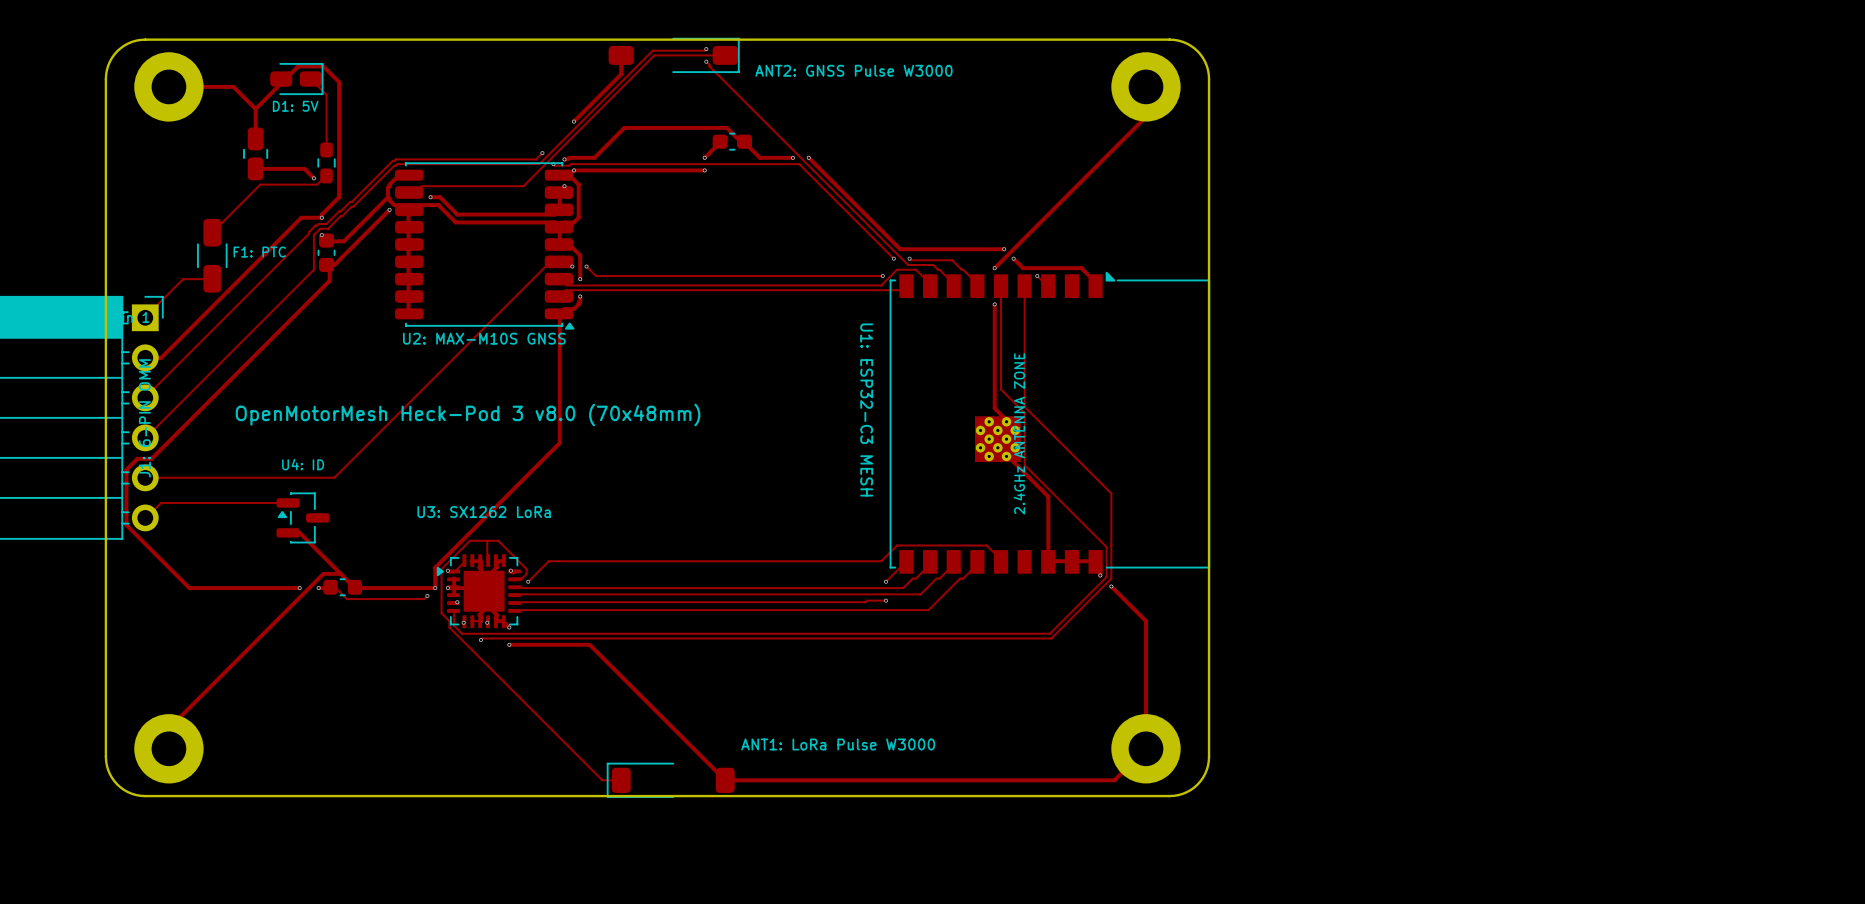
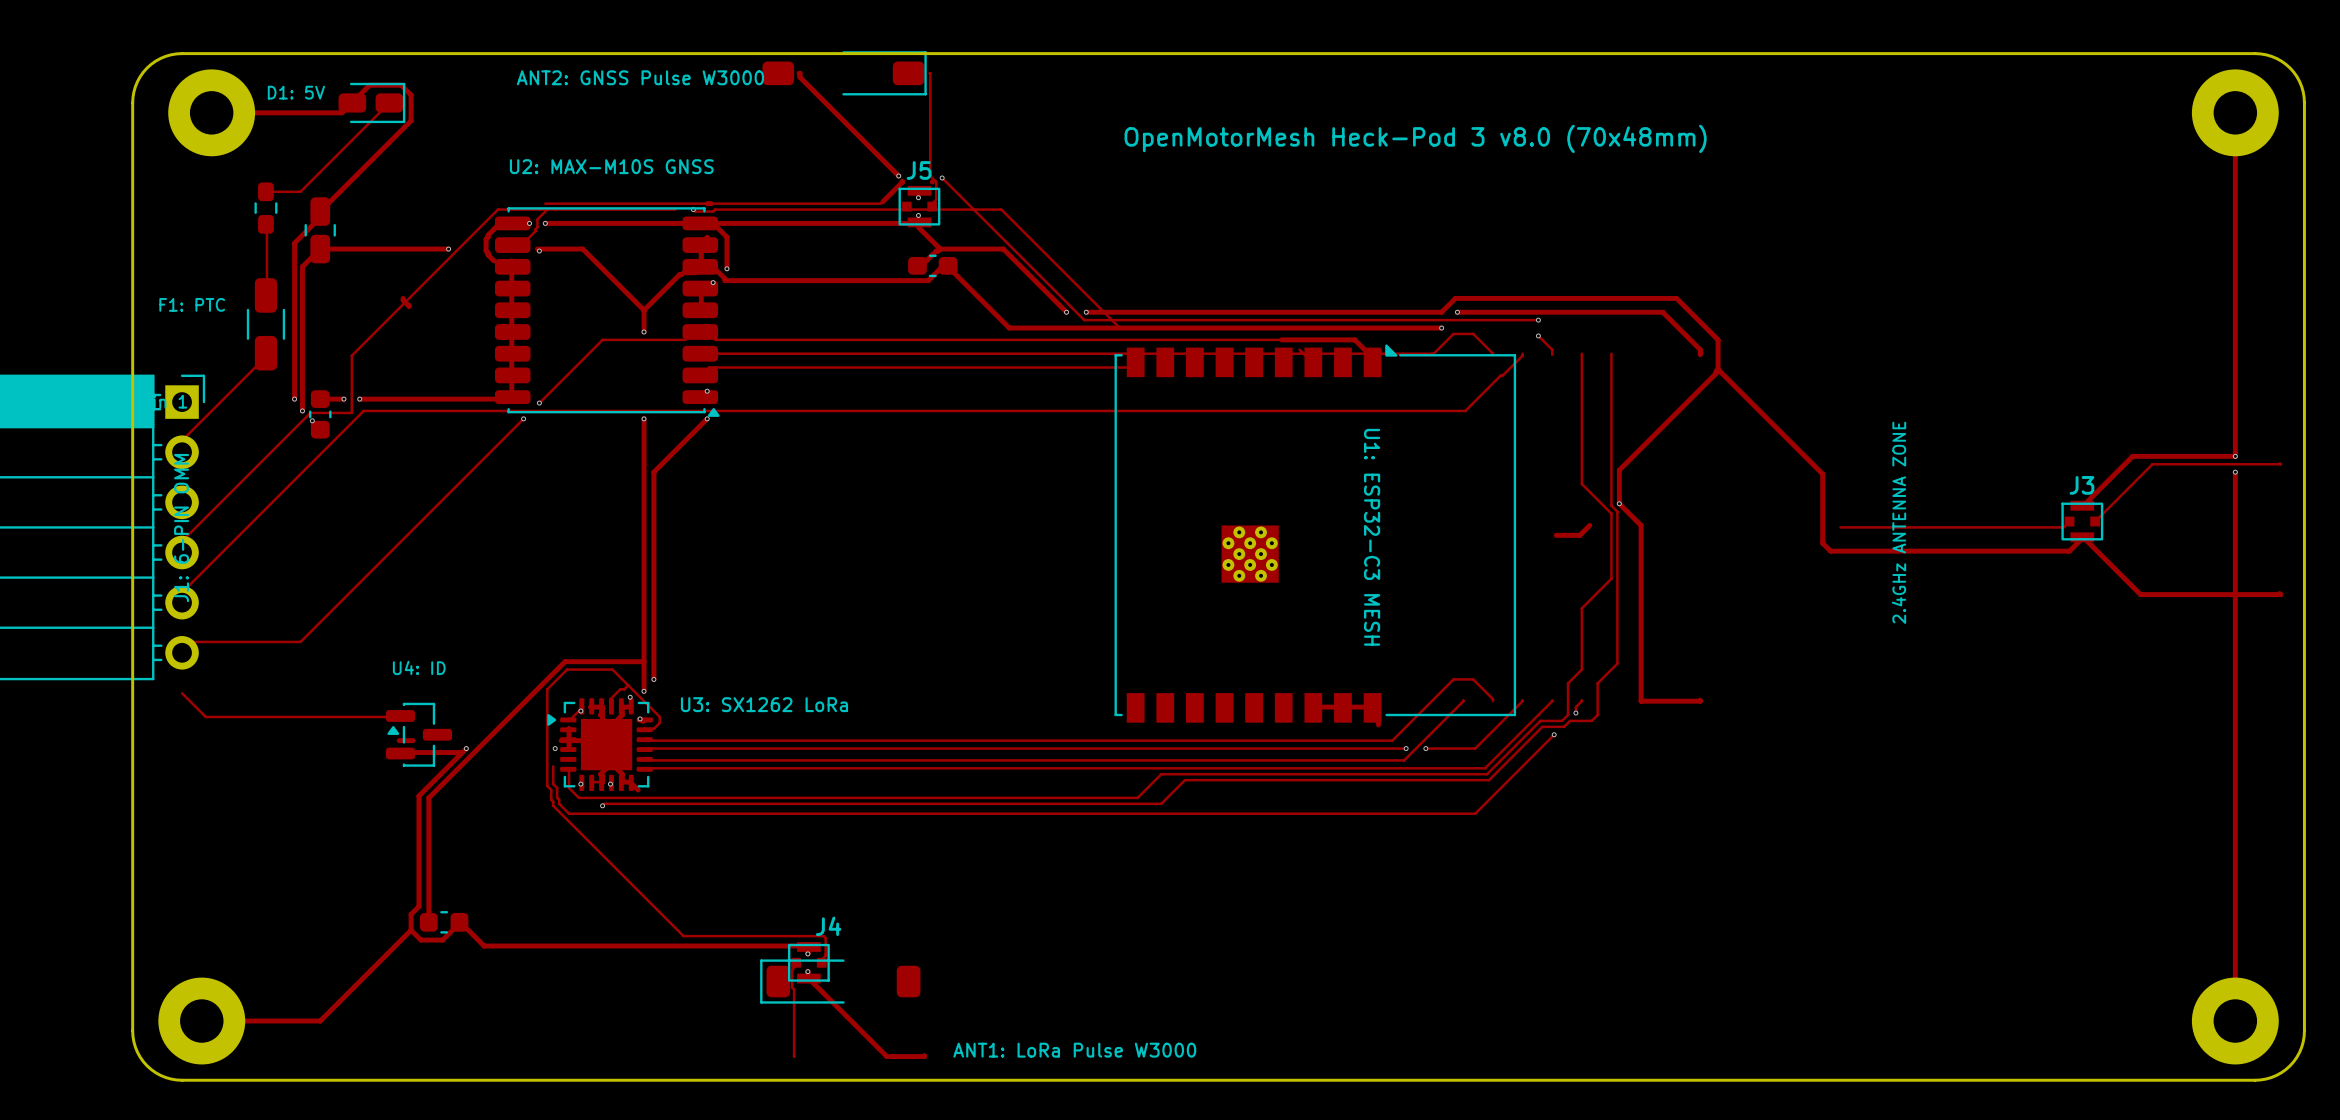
board edge: (1169, 39) (1186, 43) (1197, 51) (1206, 66) (1209, 79) (1209, 756) (1205, 773) (1190, 790) (1169, 796) (145, 796) (132, 793) (117, 784) (109, 773) (105, 756) -> (1465, 53) (2255, 53) (2276, 58) (2293, 72) (2301, 86) (2304, 102) (2304, 1030) (2299, 1052) (2285, 1069) (2271, 1077) (2255, 1080) (176, 1079) (165, 1077) (151, 1069) (143, 1061) (135, 1047) (132, 1030) (132, 951)
track: (706, 49) (704, 50) (652, 50) (539, 164) -> none
via: (706, 49) -> none
track: (621, 55) (621, 74) (573, 121) -> none
track: none -> (799, 73) (800, 77) (898, 176)
track: (725, 55) (654, 55) (523, 186) (421, 186) -> none
track: none -> (929, 73) (930, 176) (936, 181) (936, 199) (932, 203) (932, 207)
track: (706, 61) (908, 264) (933, 264) (953, 283) (953, 286) -> none
via: (706, 61) -> none
text position: ANT2: GNSS Pulse W3000 (853, 70) -> ANT2: GNSS Pulse W3000 (640, 77)
track: (310, 79) (326, 94) (326, 149) -> (389, 102) (300, 191) (265, 191)
track: (233, 86) (255, 108) -> (292, 112) (341, 112) (369, 85) (401, 85) (411, 95) (411, 120) (320, 211) (320, 217) (294, 243) (294, 399)
track: (1146, 86) (1146, 116) (994, 268) -> none
part: (1146, 86) -> none
track: none -> (2235, 112) (2235, 456) (2132, 456) (2082, 505)
part: none -> (2235, 112)
text position: D1: 5V (295, 106) -> D1: 5V (296, 92)
text: none -> OpenMotorMesh Heck-Pod 3 v8.0 (70x48mm) (1415, 138)
track: (255, 108) (298, 66) (323, 66) (339, 82) (339, 197) (321, 214) (321, 217) (301, 217) (161, 357) (145, 357) -> none
track: (255, 108) (255, 138) -> none
via: (573, 121) -> none
via: none -> (898, 176)
track: none -> (942, 177) (1084, 320) (1538, 320)
via: none -> (942, 177)
part position: (732, 141) -> (932, 265)
part position: (255, 153) -> (320, 230)
track: (542, 153) (536, 159) -> (707, 203) (671, 203)
via: (542, 153) -> none
via: none -> (918, 197)
via: (704, 157) -> none
track: (792, 157) (759, 157) (726, 127) (624, 127) (594, 157) (567, 159) -> (882, 201) (880, 203) (711, 203)
via: (792, 157) -> none
track: (808, 157) (900, 249) (1004, 249) -> none
via: (808, 157) -> none
track: (435, 159) (392, 160) (326, 224) (315, 225) (145, 397) -> none
via: (564, 159) -> none
J5: none -> (919, 206)
part position: (326, 162) -> (265, 208)
track: none -> (547, 209) (537, 219) (535, 231) (521, 245) (512, 245)
track: (395, 165) (328, 228) (320, 228) (313, 235) (313, 269) (145, 438) -> (495, 211) (351, 355) (351, 412) (310, 412) (182, 541)
track: (255, 168) (304, 168) (313, 178) -> none
via: none -> (918, 215)
via: (573, 170) -> none
track: (704, 170) (573, 170) (569, 175) -> (919, 222) (713, 223)
via: (704, 170) -> none
track: (326, 175) (317, 184) (260, 184) (213, 231) -> (265, 224) (266, 294)
via: none -> (529, 223)
track: none -> (545, 223) (700, 223)
via: none -> (545, 223)
via: (313, 178) -> none
track: none -> (918, 227) (940, 249)
track: (578, 184) (578, 217) (573, 222) (564, 222) (559, 227) (555, 222) (455, 222) (438, 205) (394, 205) -> (724, 235) (726, 237) (726, 268)
via: (564, 186) -> none
track: none -> (448, 249) (320, 249) (302, 266) (302, 410)
via: none -> (448, 249)
track: none -> (537, 249) (582, 249) (644, 310)
track: none -> (940, 249) (1003, 249) (1066, 312)
track: none -> (940, 249) (920, 266) (917, 265)
track: (387, 197) (343, 241) (326, 241) -> none
track: (430, 197) (439, 197) (457, 214) (545, 214) -> (644, 310) (683, 272)
track: (389, 209) (334, 264) (326, 264) -> none
via: (389, 209) -> none
track: none -> (701, 266) (713, 266) (724, 280) (928, 280) (942, 266) (948, 266)
track: none -> (948, 266) (1009, 328) (1441, 328)
via: none -> (726, 268)
via: (321, 217) -> none
via: none -> (713, 282)
via: (321, 235) -> none
track: none -> (644, 310) (644, 331)
track: (559, 244) (569, 244) (580, 255) (580, 279) -> none
via: none -> (1066, 312)
track: none -> (1086, 312) (1441, 312) (1455, 298) (1676, 298) (1718, 339) (1718, 369)
via: none -> (1086, 312)
track: none -> (1457, 312) (1662, 312) (1700, 349) (1700, 354)
via: none -> (1457, 312)
via: (1004, 249) -> none
text position: F1: PTC (259, 252) -> F1: PTC (192, 304)
part position: (326, 252) -> (320, 414)
via: none -> (1538, 320)
via: (893, 258) -> none
track: (909, 258) (911, 260) (952, 260) (977, 283) (977, 286) -> none
via: (909, 258) -> none
track: (1013, 258) (1023, 268) -> (715, 339) (1281, 339)
via: (1013, 258) -> none
via: none -> (1441, 328)
via: none -> (644, 331)
track: (558, 261) (550, 261) (334, 477) (145, 477) -> none
track: (329, 264) (329, 280) (151, 458) (137, 458) (126, 469) (126, 525) (189, 588) (299, 588) -> none
track: none -> (1538, 335) (1552, 349) (1552, 354)
via: none -> (1538, 335)
via: (572, 266) -> none
track: (586, 266) (596, 276) (882, 276) -> none
via: (586, 266) -> none
track: none -> (685, 339) (602, 339) (539, 403)
via: (994, 268) -> none
via: (882, 276) -> none
via: (1037, 276) -> none
track: (213, 279) (183, 279) (145, 317) -> (266, 353) (182, 440)
track: none -> (701, 353) (1433, 353) (1453, 333) (1473, 333) (1492, 354)
via: (580, 279) -> none
track: none -> (1522, 353) (1465, 410) (363, 410) (182, 592)
track: (566, 285) (881, 285) (897, 269) (915, 269) (930, 286) -> none
track: (1001, 285) (1001, 389) (1024, 413) (1024, 465) (1106, 547) (1106, 577) (1049, 633) (908, 633) -> (1581, 353) (1581, 484) (1611, 513) (1611, 578) (1581, 608) (1581, 669) (1568, 683) (1568, 715) (1562, 720) (1540, 720) (1487, 774) (1161, 774) (1137, 797)
track: (1024, 285) (1024, 406) (1111, 493) (1111, 578) (1051, 638) (926, 638) -> (1611, 353) (1611, 505) (1617, 511) (1617, 663) (1597, 683) (1597, 715) (1591, 720) (1569, 720) (1564, 726) (1542, 726) (1489, 780) (1185, 780) (1161, 803)
track: none -> (1718, 369) (1822, 474) (1822, 543) (1830, 551) (2069, 551) (2083, 537)
track: none -> (1718, 369) (1619, 470) (1619, 503) (1641, 525) (1641, 701) (1700, 700)
track: (580, 296) (578, 304) (573, 309) (564, 309) -> none
via: (580, 296) -> none
track: (994, 304) (994, 408) (1007, 421) -> none
via: (994, 304) -> none
via: none -> (707, 391)
track: none -> (511, 397) (509, 399) (359, 399)
track: (559, 313) (559, 443) (435, 567) (435, 588) (354, 588) -> none
via: none -> (294, 399)
track: none -> (320, 399) (343, 399)
via: none -> (343, 399)
via: none -> (359, 399)
via: none -> (539, 403)
via: none -> (302, 410)
track: none -> (523, 418) (300, 641) (182, 641)
via: none -> (523, 418)
track: none -> (644, 418) (644, 691)
via: none -> (644, 418)
track: none -> (707, 418) (653, 472) (653, 679)
via: none -> (707, 418)
via: none -> (312, 420)
text position: U2: MAX-M10S GNSS (484, 338) -> U2: MAX-M10S GNSS (611, 166)
via: none -> (2235, 456)
track: none -> (2279, 463) (2152, 464) (2095, 521)
track: none -> (2235, 472) (2235, 1021)
via: none -> (2235, 472)
via: none -> (1619, 503)
text position: U1: ESP32-C3 MESH (866, 409) -> U1: ESP32-C3 MESH (1372, 537)
track: none -> (2069, 521) (2063, 527) (1840, 527)
J3: none -> (2082, 521)
text: none -> 2.4GHz ANTENNA ZONE (1898, 522)
text: OpenMotorMesh Heck-Pod 3 v8.0 (70x48mm) (468, 415) -> none
track: none -> (1589, 525) (1579, 535) (1556, 535)
track: none -> (2083, 537) (2140, 594) (2279, 593)
text: 2.4GHz ANTENNA ZONE (1019, 433) -> none
track: (1007, 455) (1048, 496) (1048, 561) -> none
text position: U4: ID (303, 464) -> U4: ID (419, 667)
track: (288, 502) (161, 502) (145, 518) -> none
text position: U3: SX1262 LoRa (484, 512) -> U3: SX1262 LoRa (764, 704)
part: (302, 517) -> none
track: none -> (644, 661) (565, 661) (428, 797) (428, 922)
track: (299, 532) (354, 588) -> none
via: none -> (653, 679)
track: (487, 540) (487, 554) -> (628, 685) (624, 689) (620, 689) (610, 699)
track: (498, 540) (469, 540) (441, 569) (441, 608) -> (624, 681) (612, 669) (567, 669) (547, 689) (547, 786) (551, 790) (553, 805) (683, 936) (823, 936) (825, 938) (825, 955) (821, 962)
via: none -> (644, 691)
track: none -> (182, 693) (205, 716) (400, 715)
via: none -> (630, 697)
track: none -> (1522, 700) (1475, 748) (1425, 748)
track: none -> (1581, 700) (1575, 707) (1575, 713)
track: (906, 561) (885, 581) -> none
track: (930, 561) (930, 564) (915, 578) (912, 578) (903, 588) -> (1492, 701) (1473, 679) (1453, 679) (1392, 740) (1131, 740)
track: (953, 561) (953, 564) (939, 578) (936, 578) (920, 594) -> (1406, 748) (1153, 748)
track: (977, 561) (977, 564) (963, 578) (960, 578) (928, 610) -> (1552, 700) (1485, 768) (1163, 768)
track: (1001, 561) (986, 545) (897, 545) (881, 561) (548, 561) (528, 581) -> none
via: none -> (580, 711)
via: none -> (1575, 713)
via: (447, 570) -> none
track: (340, 573) (323, 573) (168, 728) (168, 748) -> none
via: (1100, 575) -> none
part footprint: [323, 578, 362, 597] -> [385, 702, 453, 767]
via: (528, 581) -> none
via: (885, 581) -> none
via: none -> (1554, 734)
track: (1111, 586) (1146, 621) (1146, 748) (1114, 780) (725, 780) (589, 644) (509, 644) -> none
via position: (1111, 586) -> (1406, 748)
track: (330, 587) (334, 586) (347, 599) (424, 599) (427, 595) -> none
via: (299, 588) -> none
via: (318, 588) -> none
via: (435, 588) -> none
via: (447, 588) -> none
track: none -> (466, 748) (462, 752) (400, 753)
via: none -> (466, 748)
via: none -> (555, 748)
via: none -> (1425, 748)
via: (427, 595) -> none
track: none -> (460, 752) (418, 795) (418, 906) (411, 914) (411, 930)
track: (885, 600) (515, 602) (514, 603) -> (1463, 700) (1404, 760) (644, 760)
via: (885, 600) -> none
via: (457, 602) -> none
track: (441, 613) (449, 621) (449, 627) (602, 780) (621, 780) -> (553, 772) (553, 784) (557, 788) (559, 803) (569, 813) (1475, 813) (1554, 734)
via: (509, 627) -> none
via: (509, 644) -> none
part: none -> (444, 922)
track: none -> (460, 922) (484, 946) (807, 946)
track: none -> (460, 922) (442, 940) (420, 940) (411, 930)
track: none -> (411, 930) (320, 1021) (201, 1021)
text position: ANT1: LoRa Pulse W3000 (838, 744) -> ANT1: LoRa Pulse W3000 (1074, 1050)
part position: (168, 748) -> (201, 1021)
part: (1146, 748) -> none
via: none -> (807, 953)
J4: none -> (808, 962)
track: none -> (794, 967) (792, 969) (792, 987) (794, 989) (794, 1056)
track: none -> (807, 971) (807, 977) (886, 1056) (924, 1055)
via: none -> (807, 971)
part: none -> (2235, 1021)

